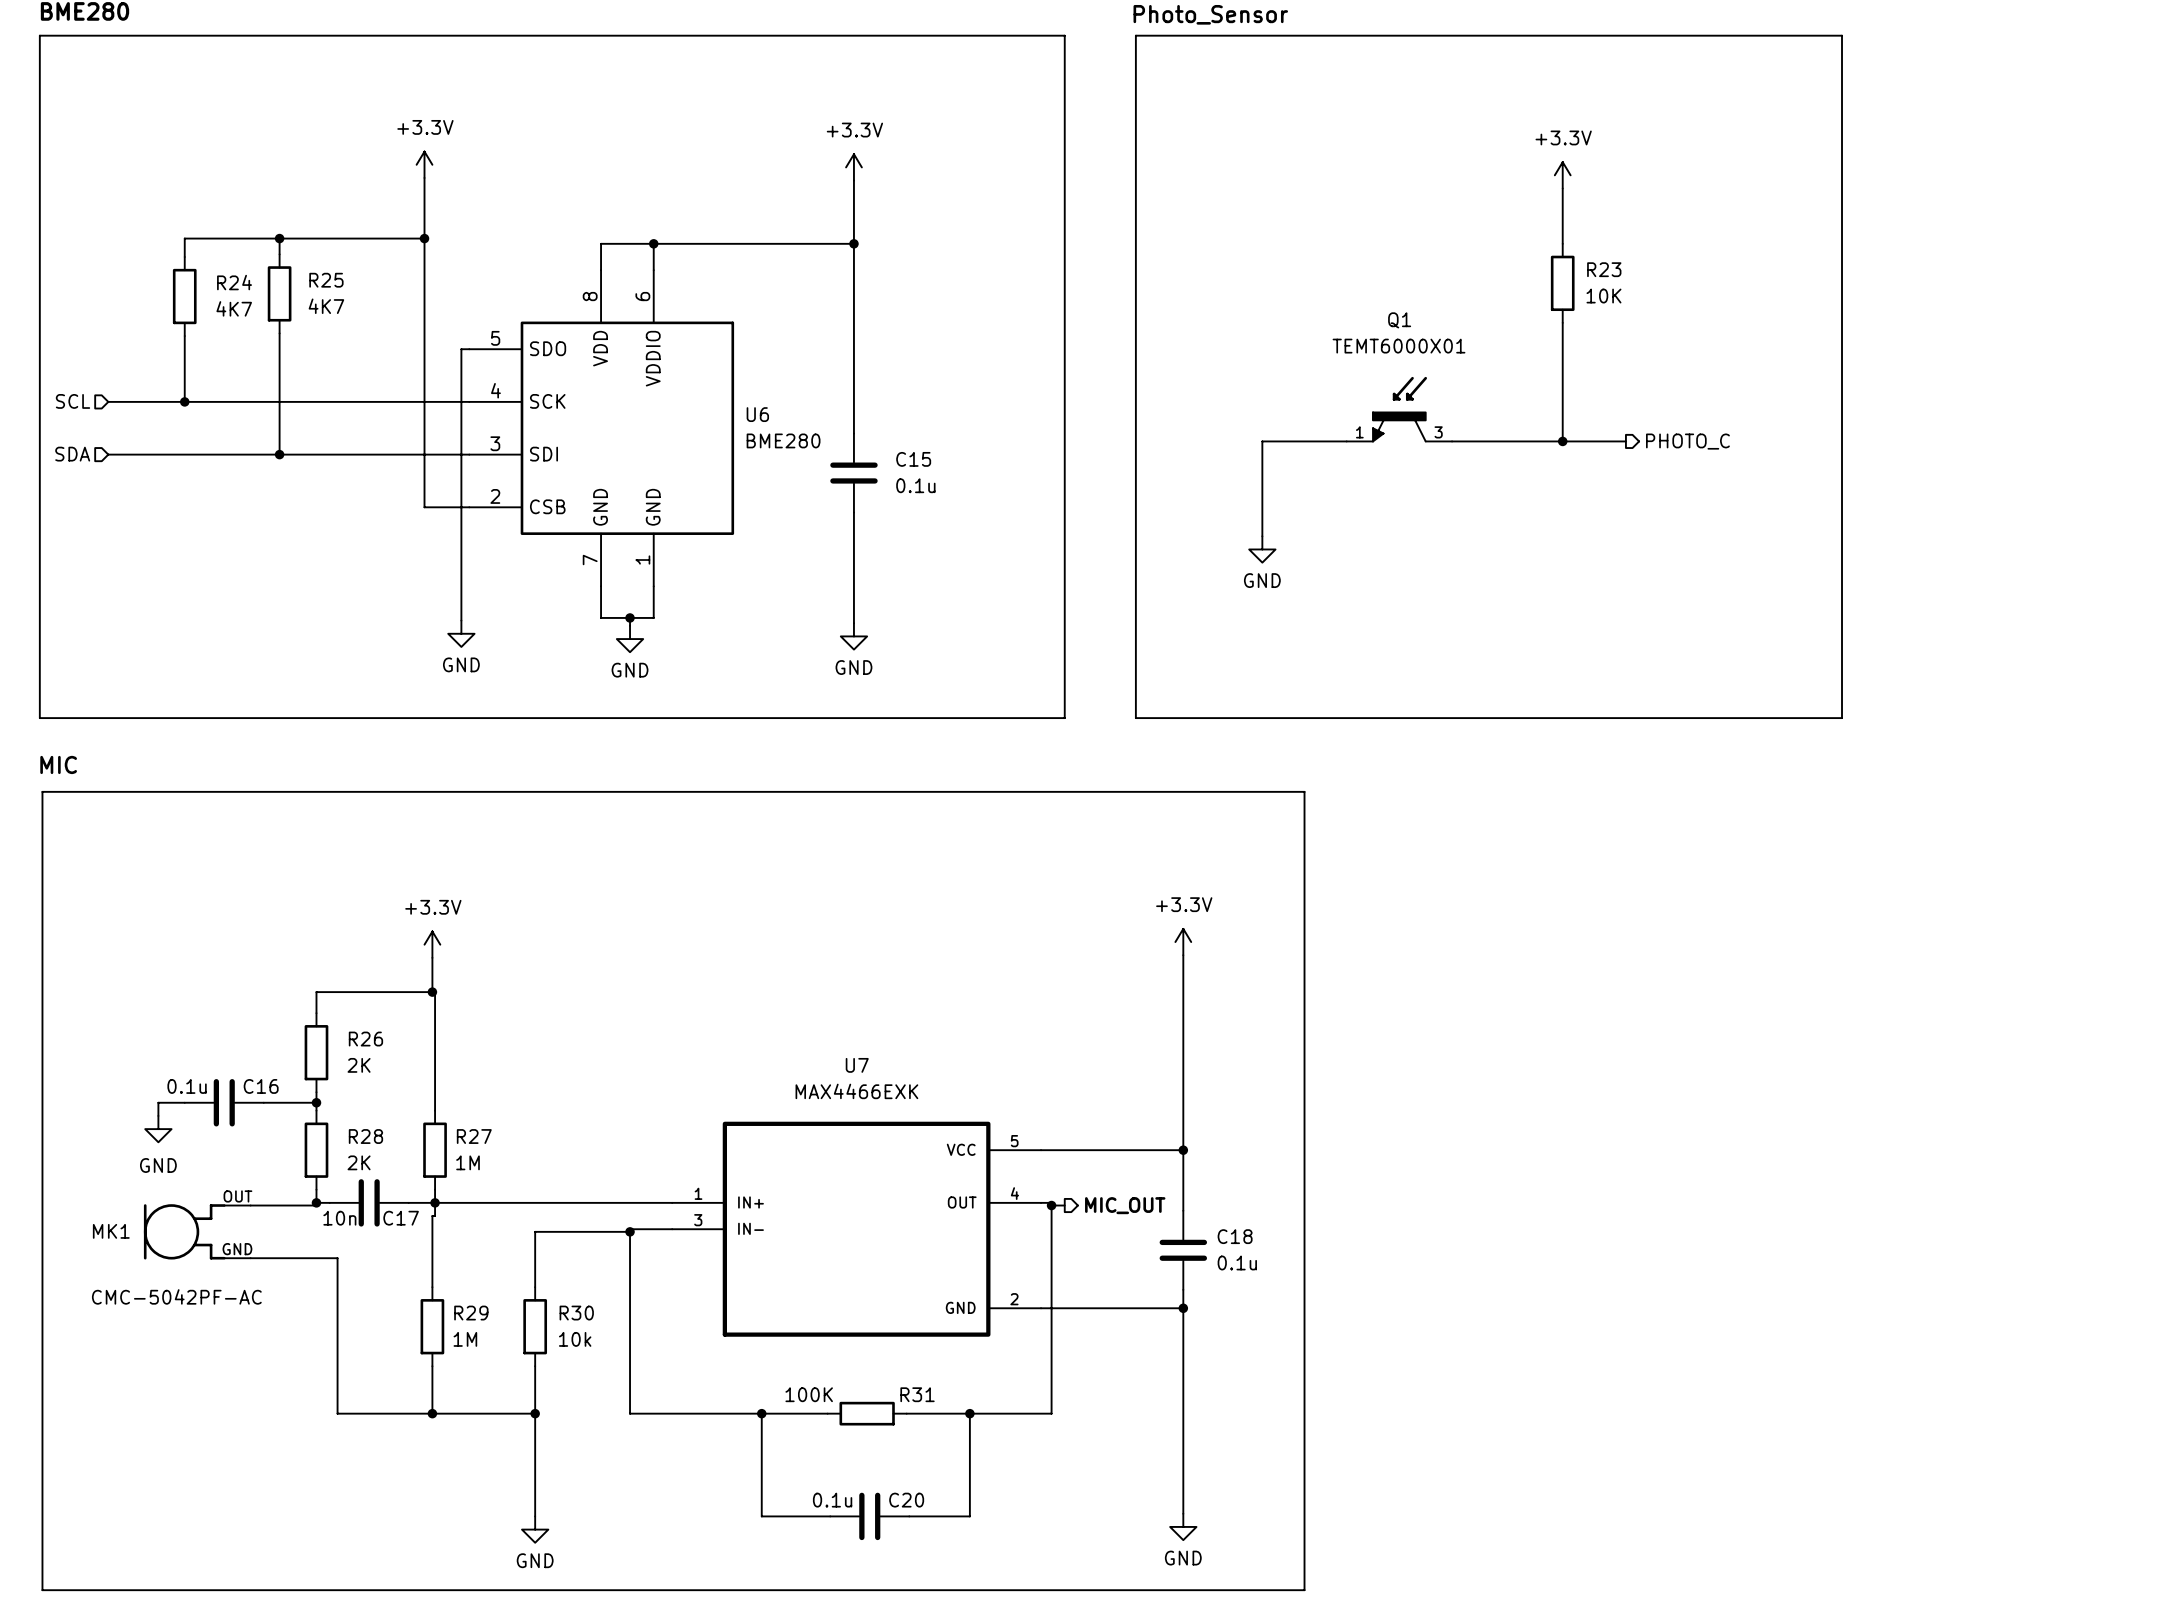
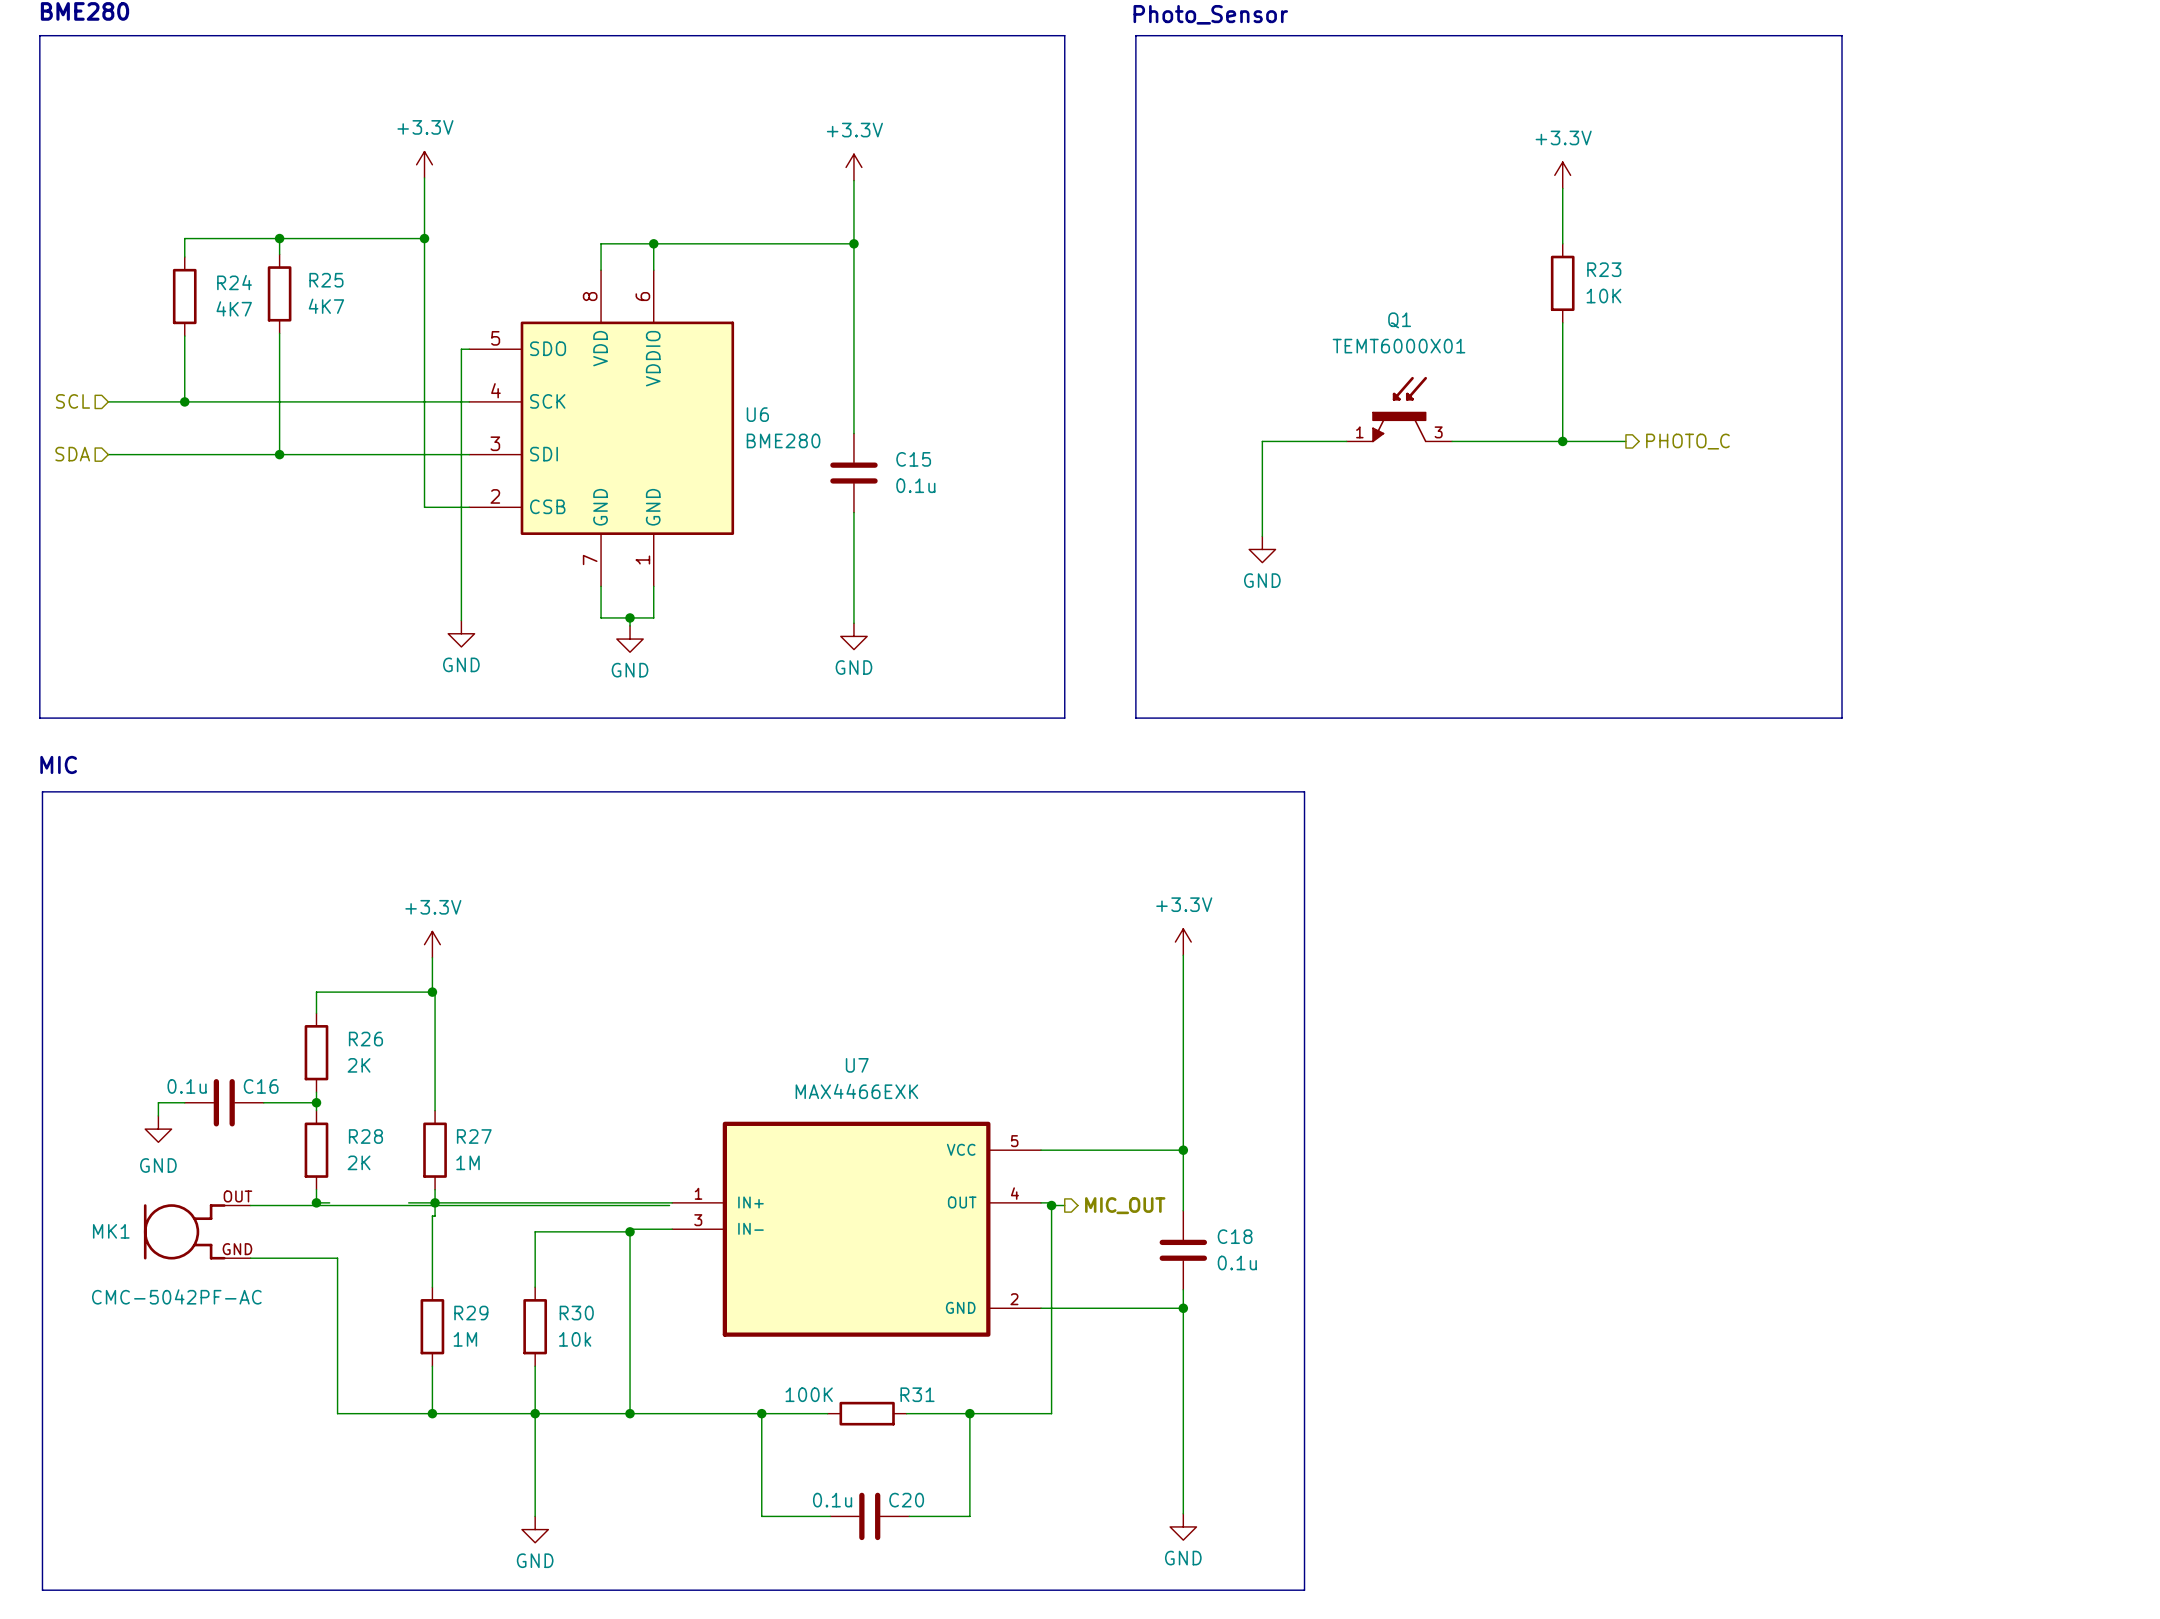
C17: 10n (369, 1202) -> none
wire: none -> (316, 1205) (669, 1205)
wire: none -> (535, 1413) (630, 1413)
junction: none -> (630, 1413)

